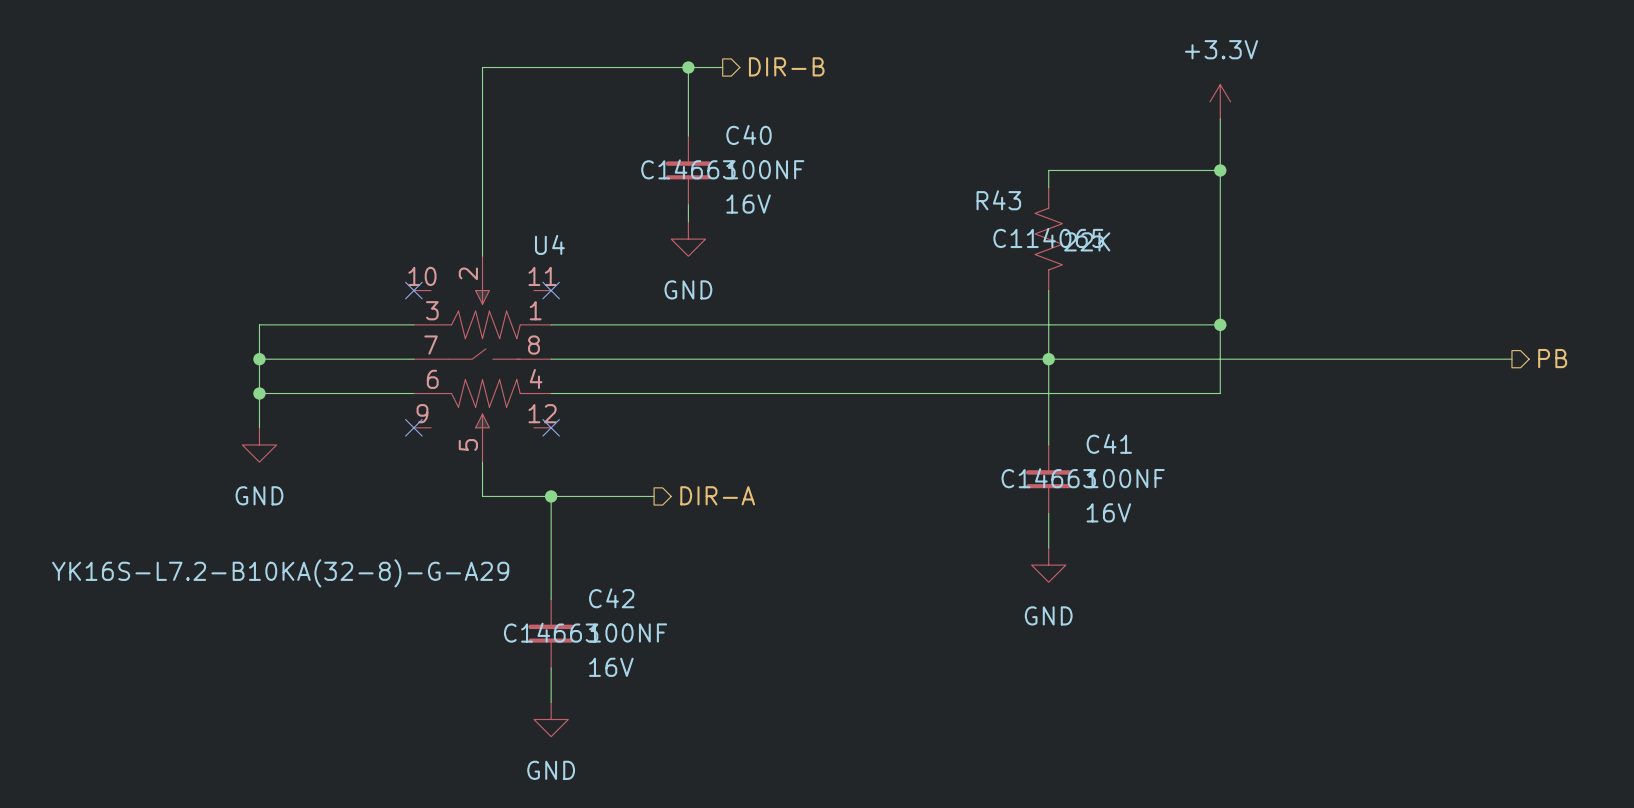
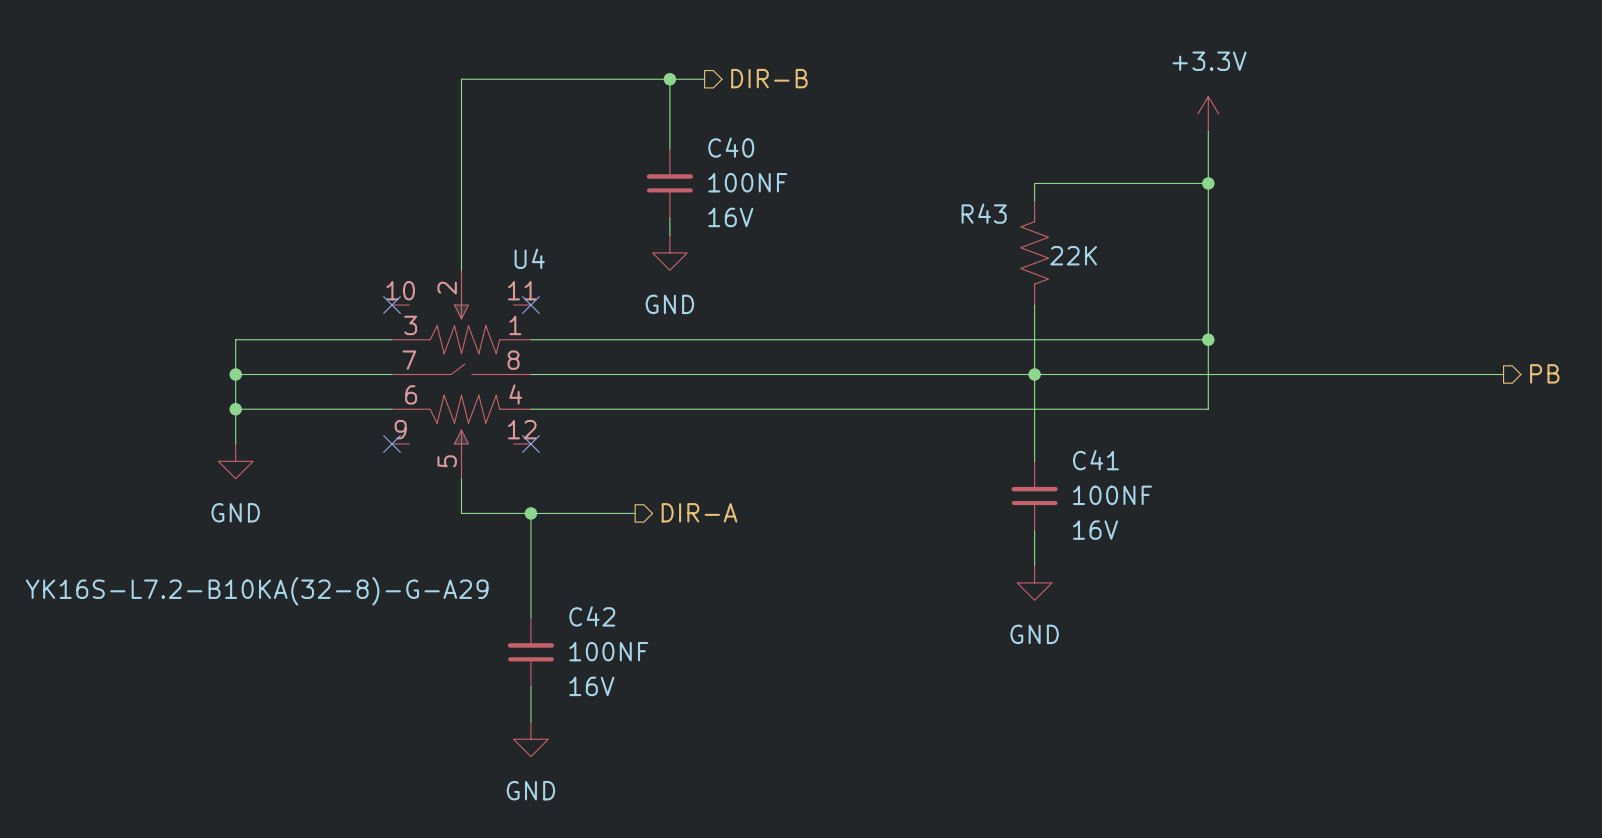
C40 text: C14663 (688, 169) -> none
R43 text: C114065 (1048, 238) -> none
C41 text: C14663 (1048, 478) -> none
C42 text: C14663 (551, 632) -> none

